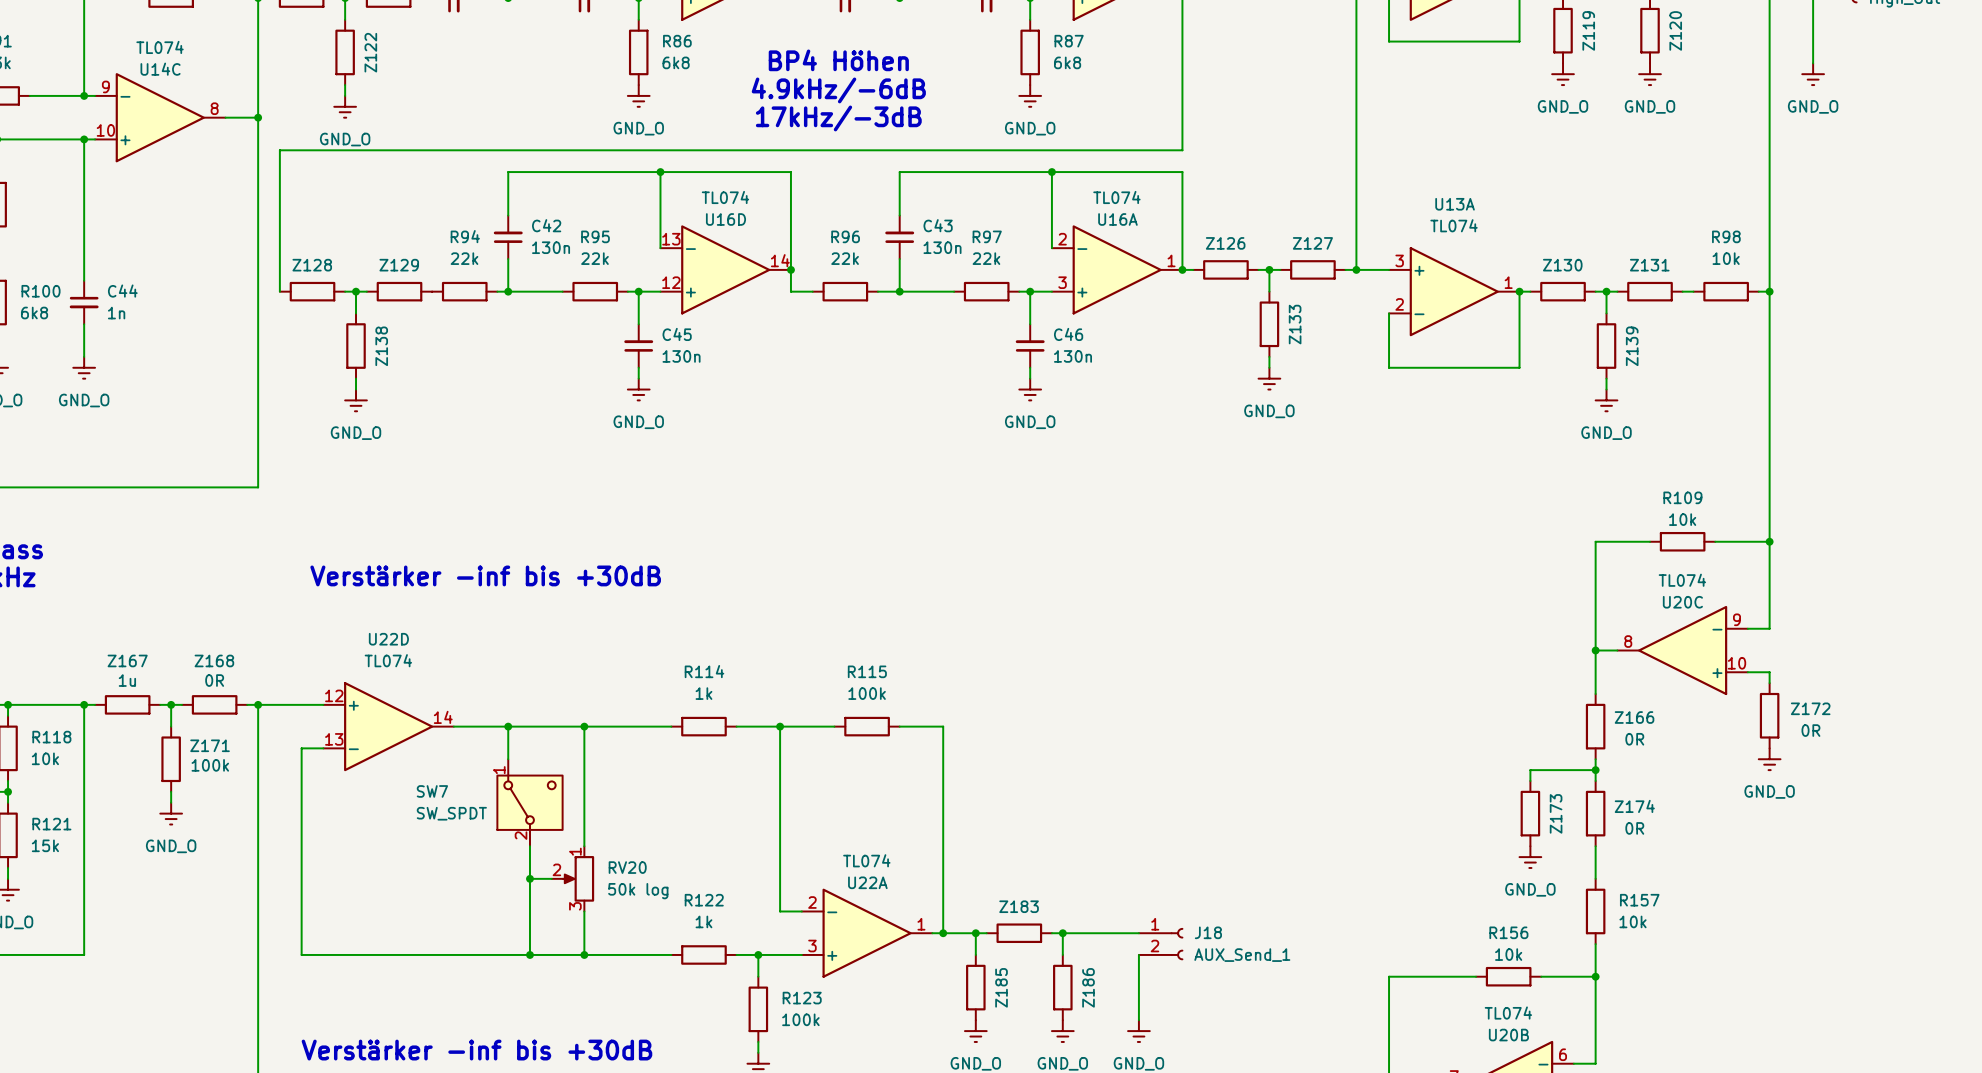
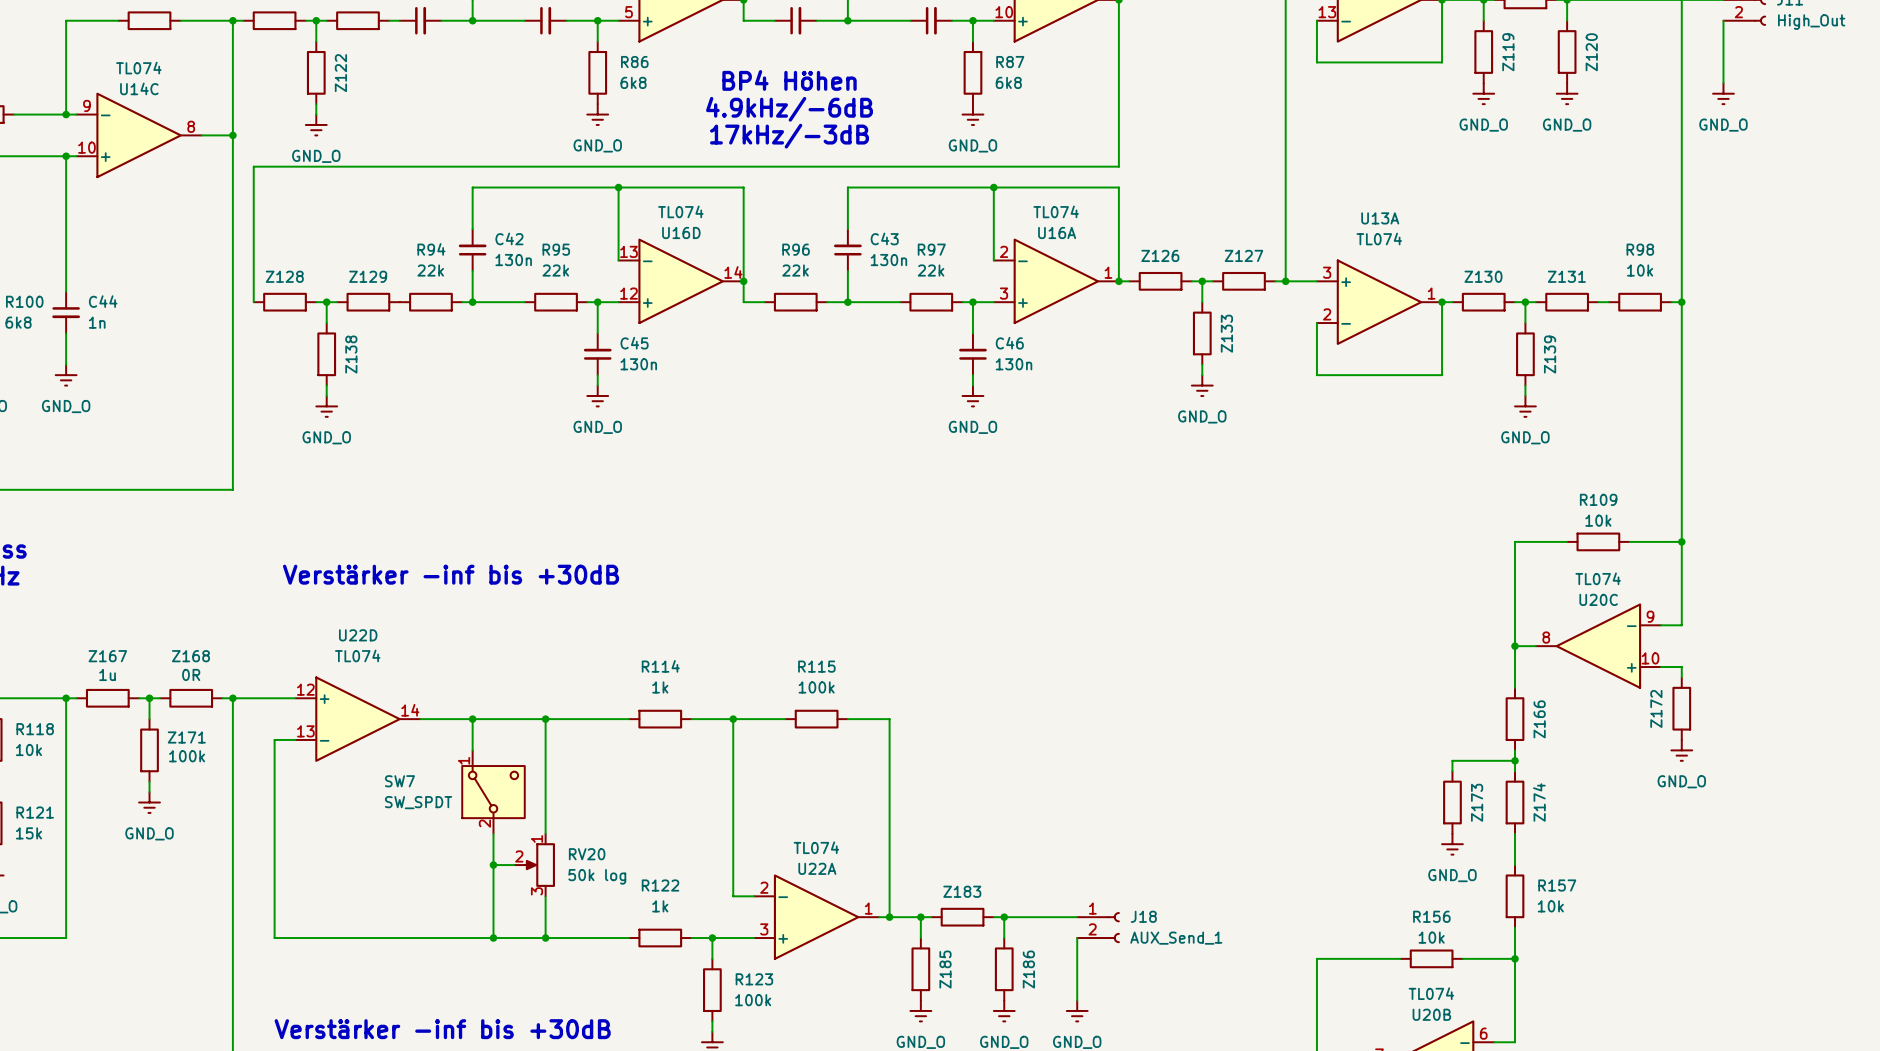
Z172 name rotation: 0° (1810, 708) -> 90° counterclockwise (1656, 708)
Z172 name position: Z172 (1810, 708) -> Z172 (1656, 708)
Z166 name rotation: 0° (1634, 717) -> 90° counterclockwise (1539, 719)
Z172 value: 0R (1810, 730) -> none
Z166 value: 0R (1634, 739) -> none
Z174 name rotation: 0° (1634, 806) -> 90° counterclockwise (1539, 802)
Z174 value: 0R (1634, 828) -> none

